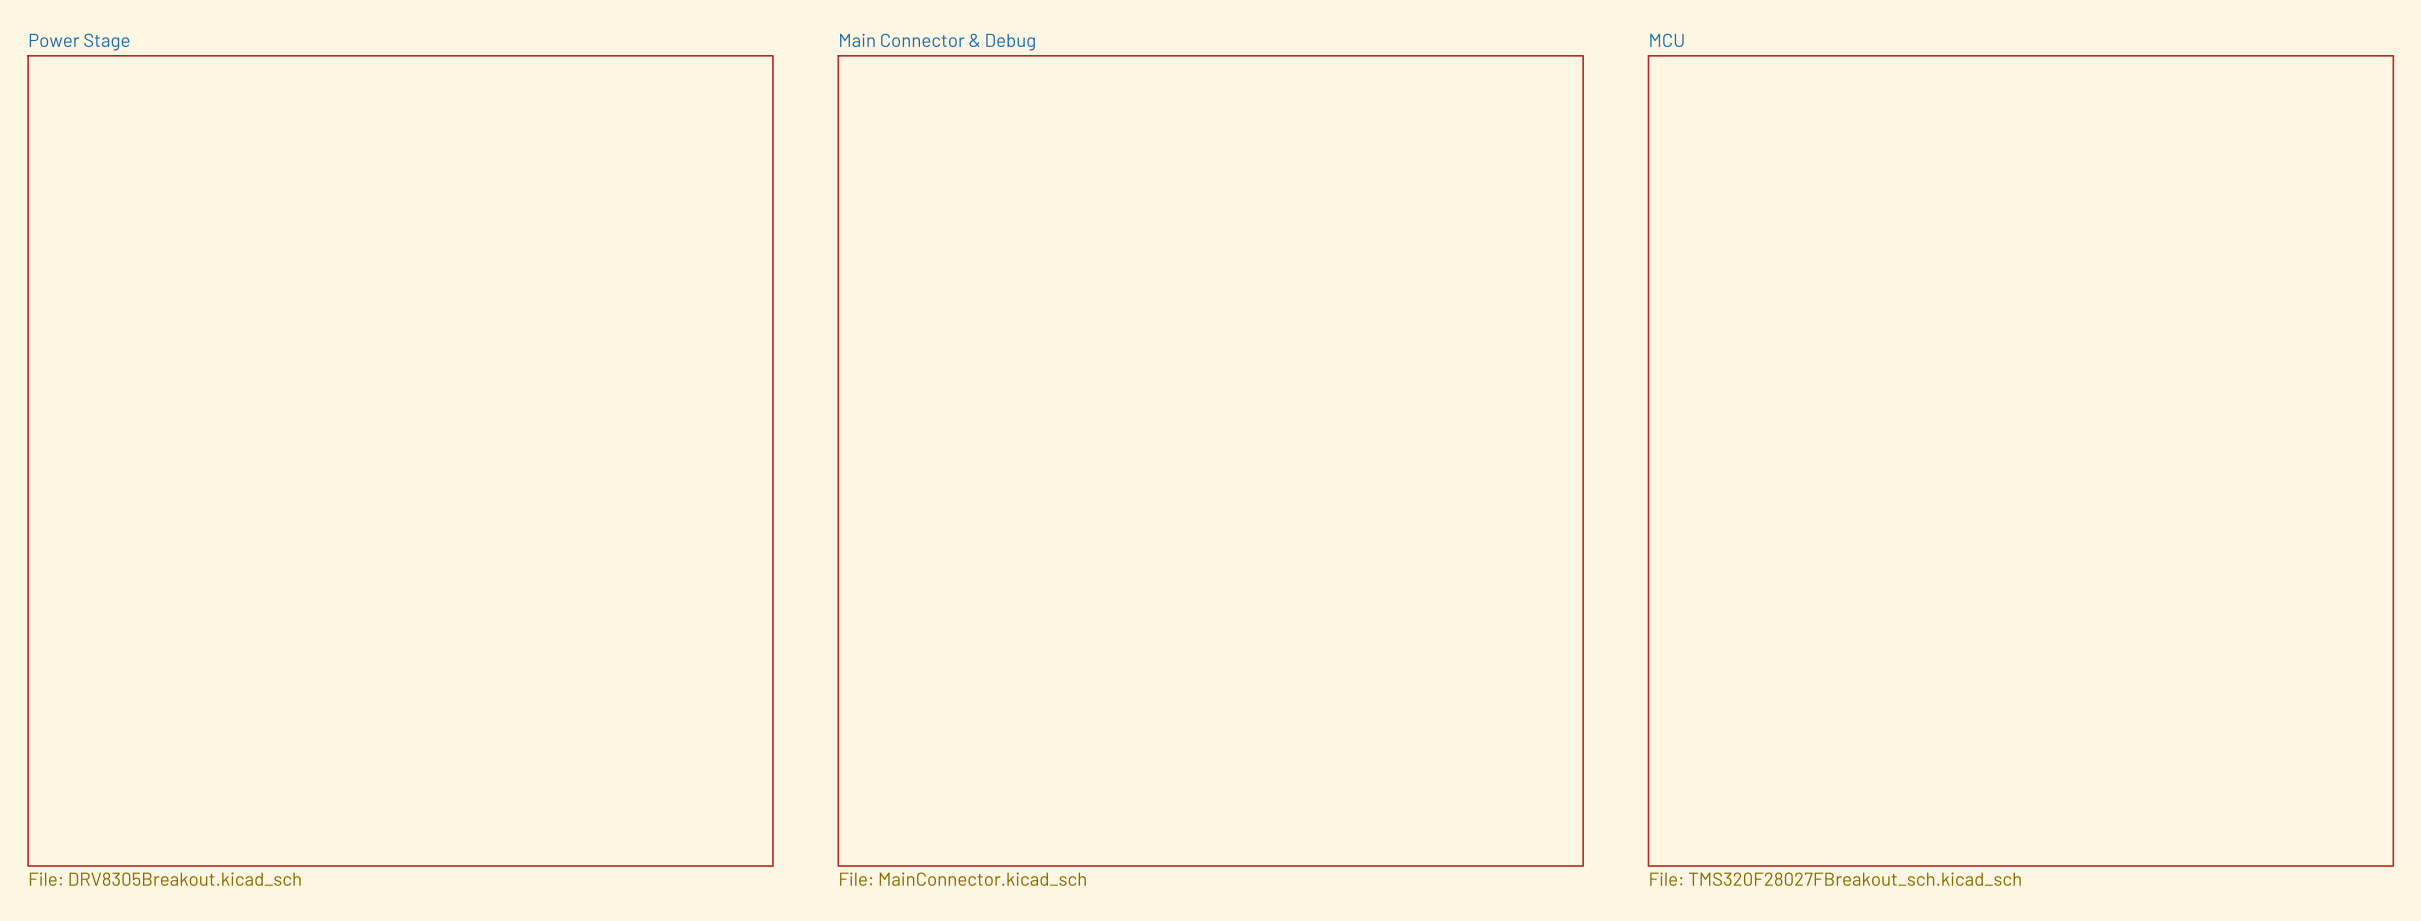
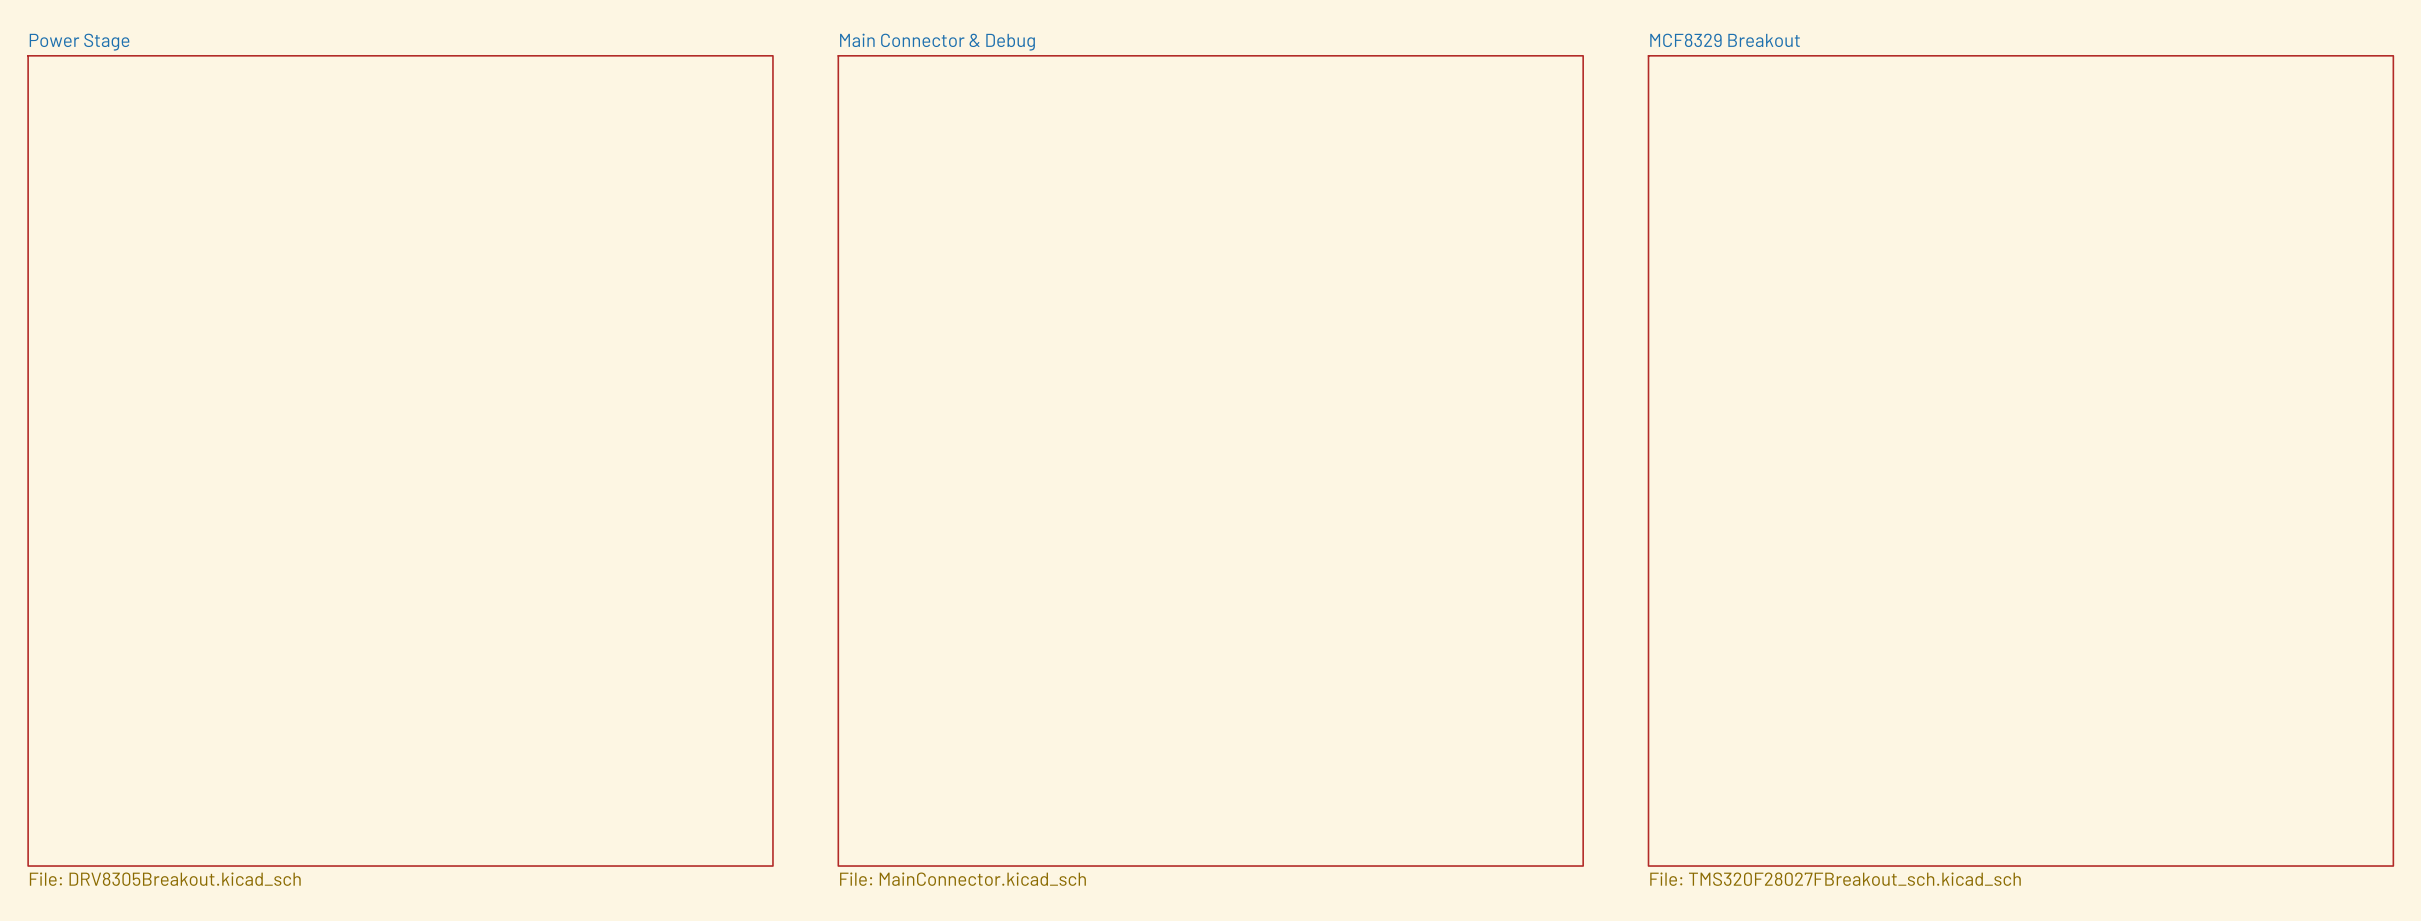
sheet MCU name: MCU (1666, 40) -> MCF8329 Breakout (1725, 40)

